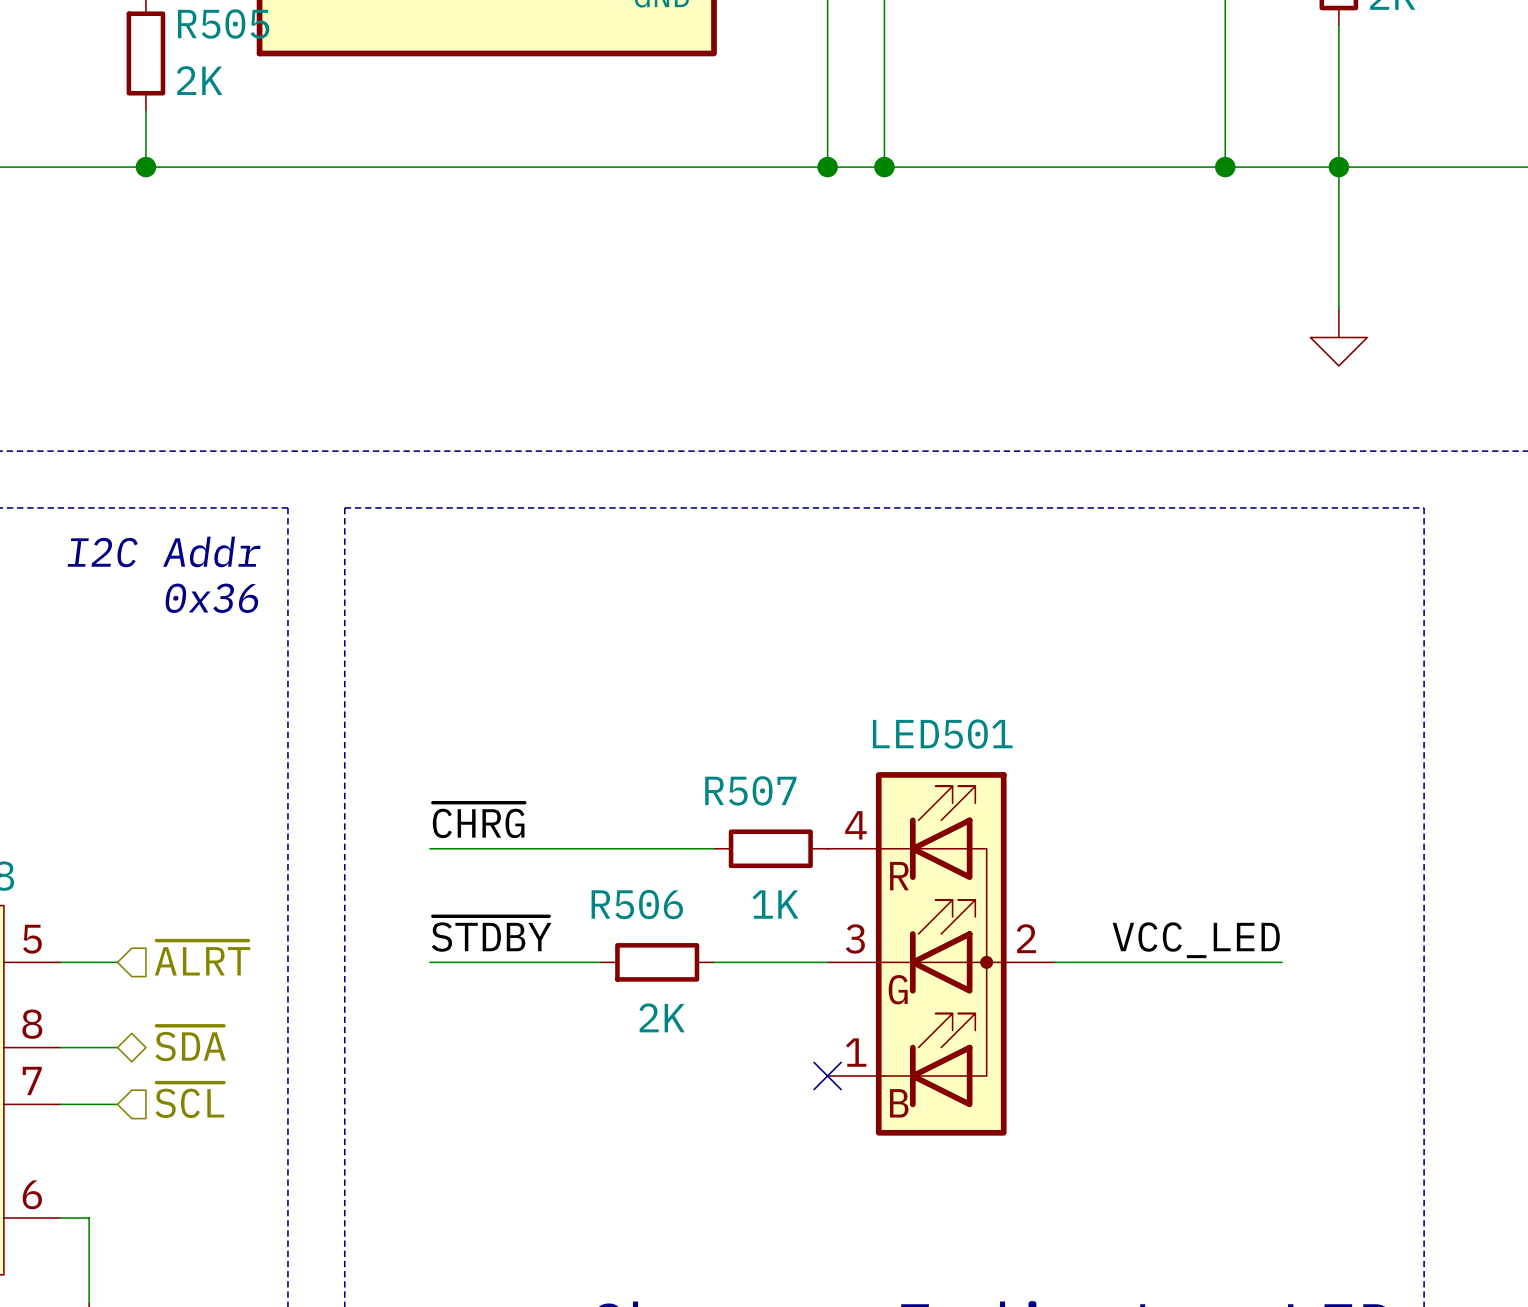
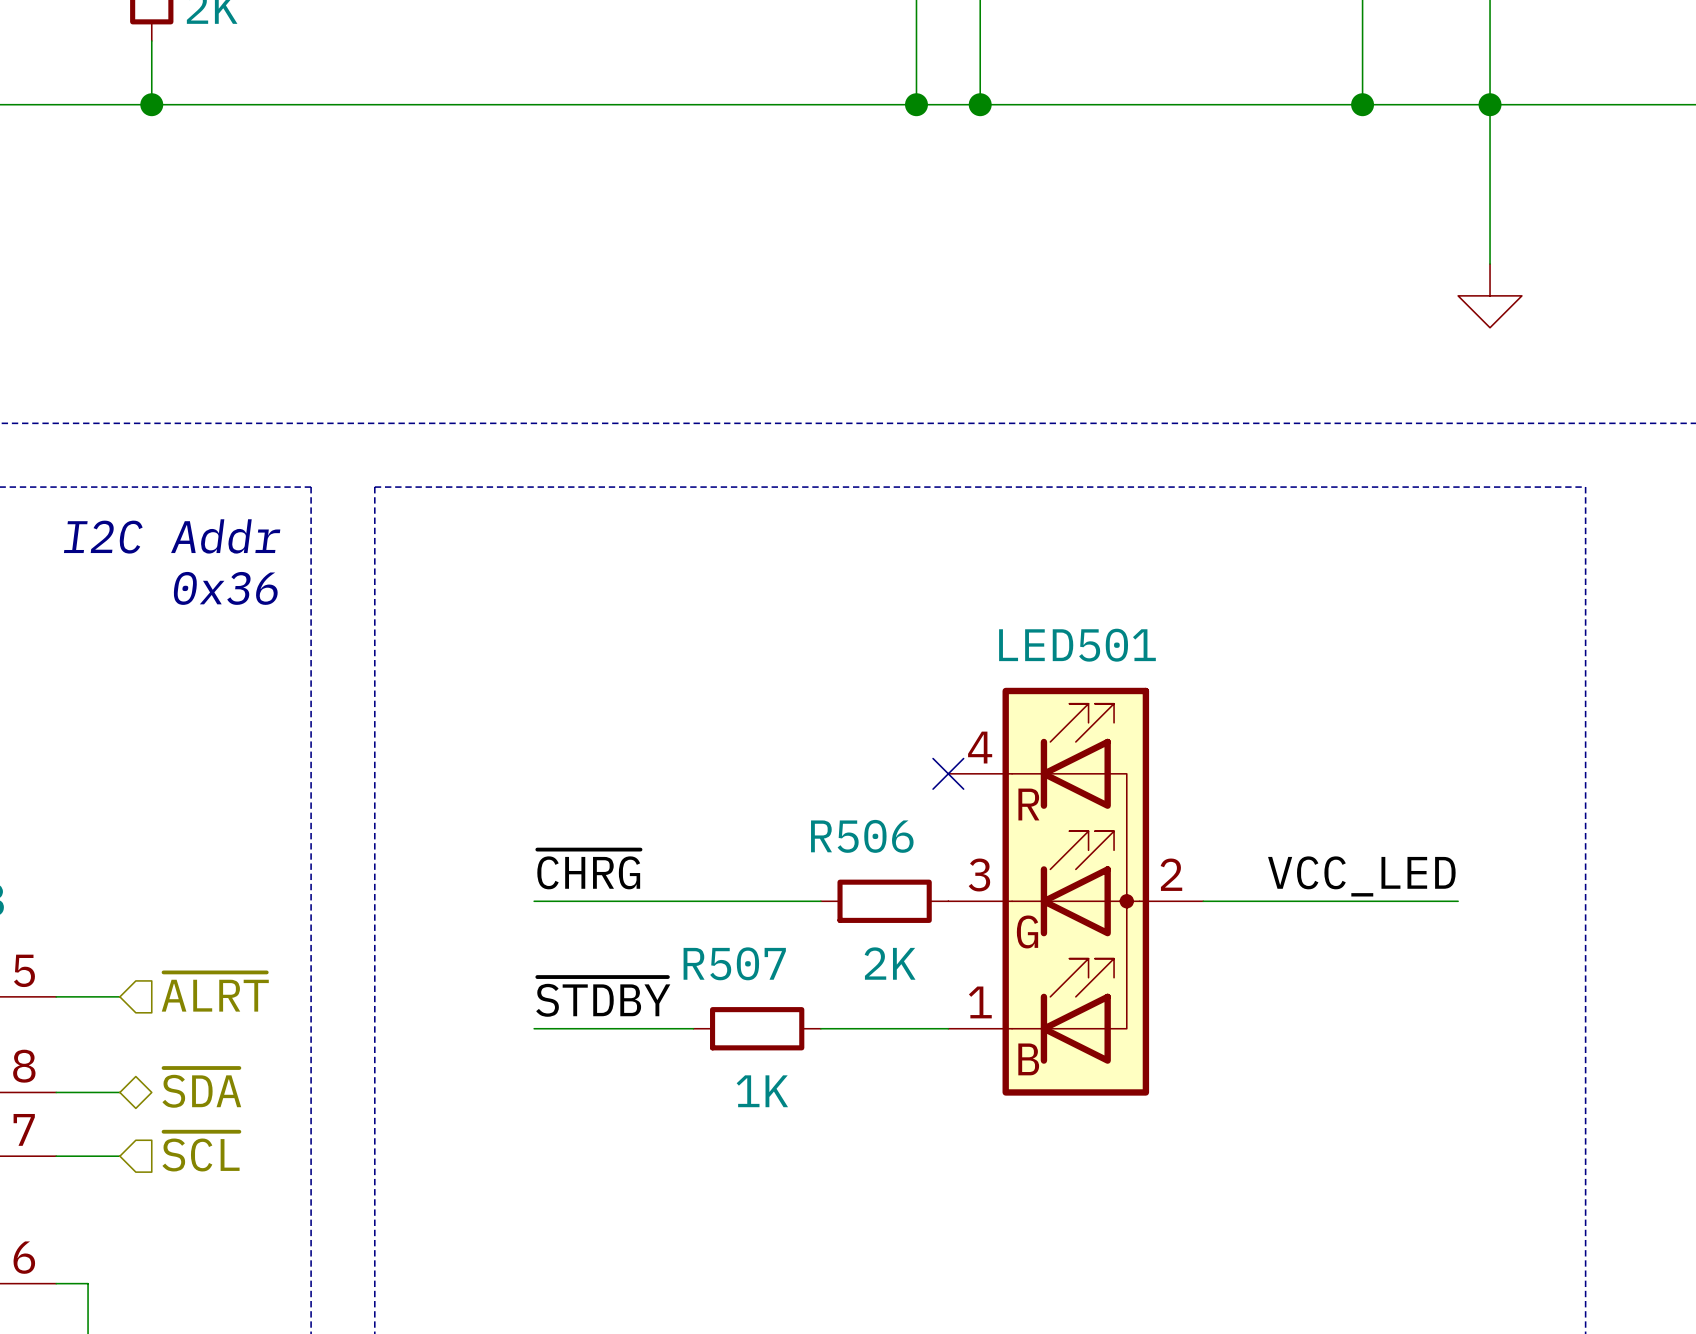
no-connect mark: none -> (948, 773)
label position: ~{CHRG} (478, 820) -> ~{CHRG} (588, 869)
wire: (429, 848) (714, 848) -> none
R507 position: (770, 848) -> (757, 1028)
wire: none -> (534, 901) (820, 901)
label position: ~{STDBY} (491, 934) -> ~{STDBY} (603, 996)
label position: VCC_LED (1196, 940) -> VCC_LED (1361, 876)
LED501 position: (941, 953) -> (1075, 891)
wire: (429, 962) (600, 962) -> none
R506 position: (657, 962) -> (884, 901)
wire: (714, 962) (827, 962) -> (820, 1028) (948, 1028)
wire: (1054, 962) (1282, 962) -> (1203, 901) (1458, 901)
wire: none -> (534, 1028) (693, 1028)
no-connect mark: (827, 1075) -> none

